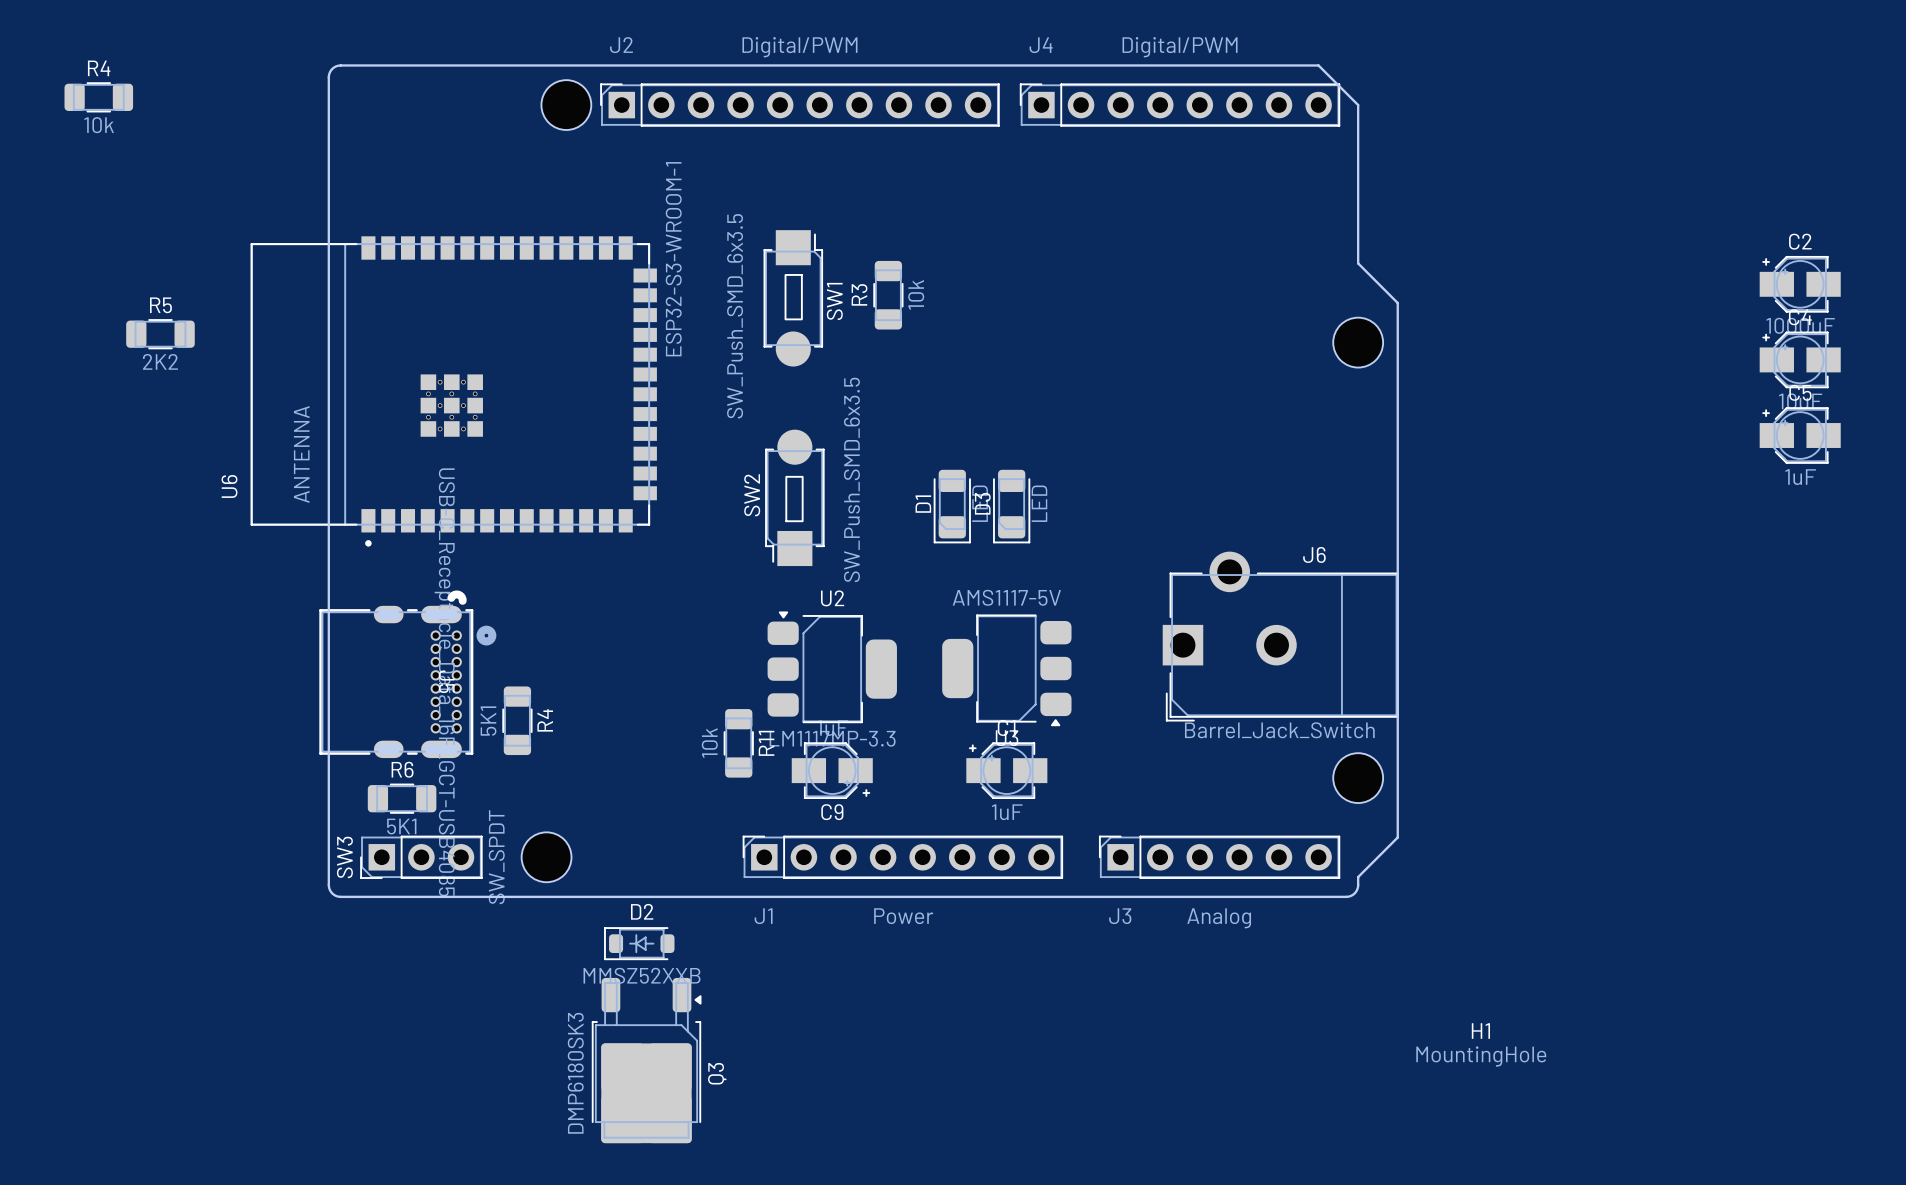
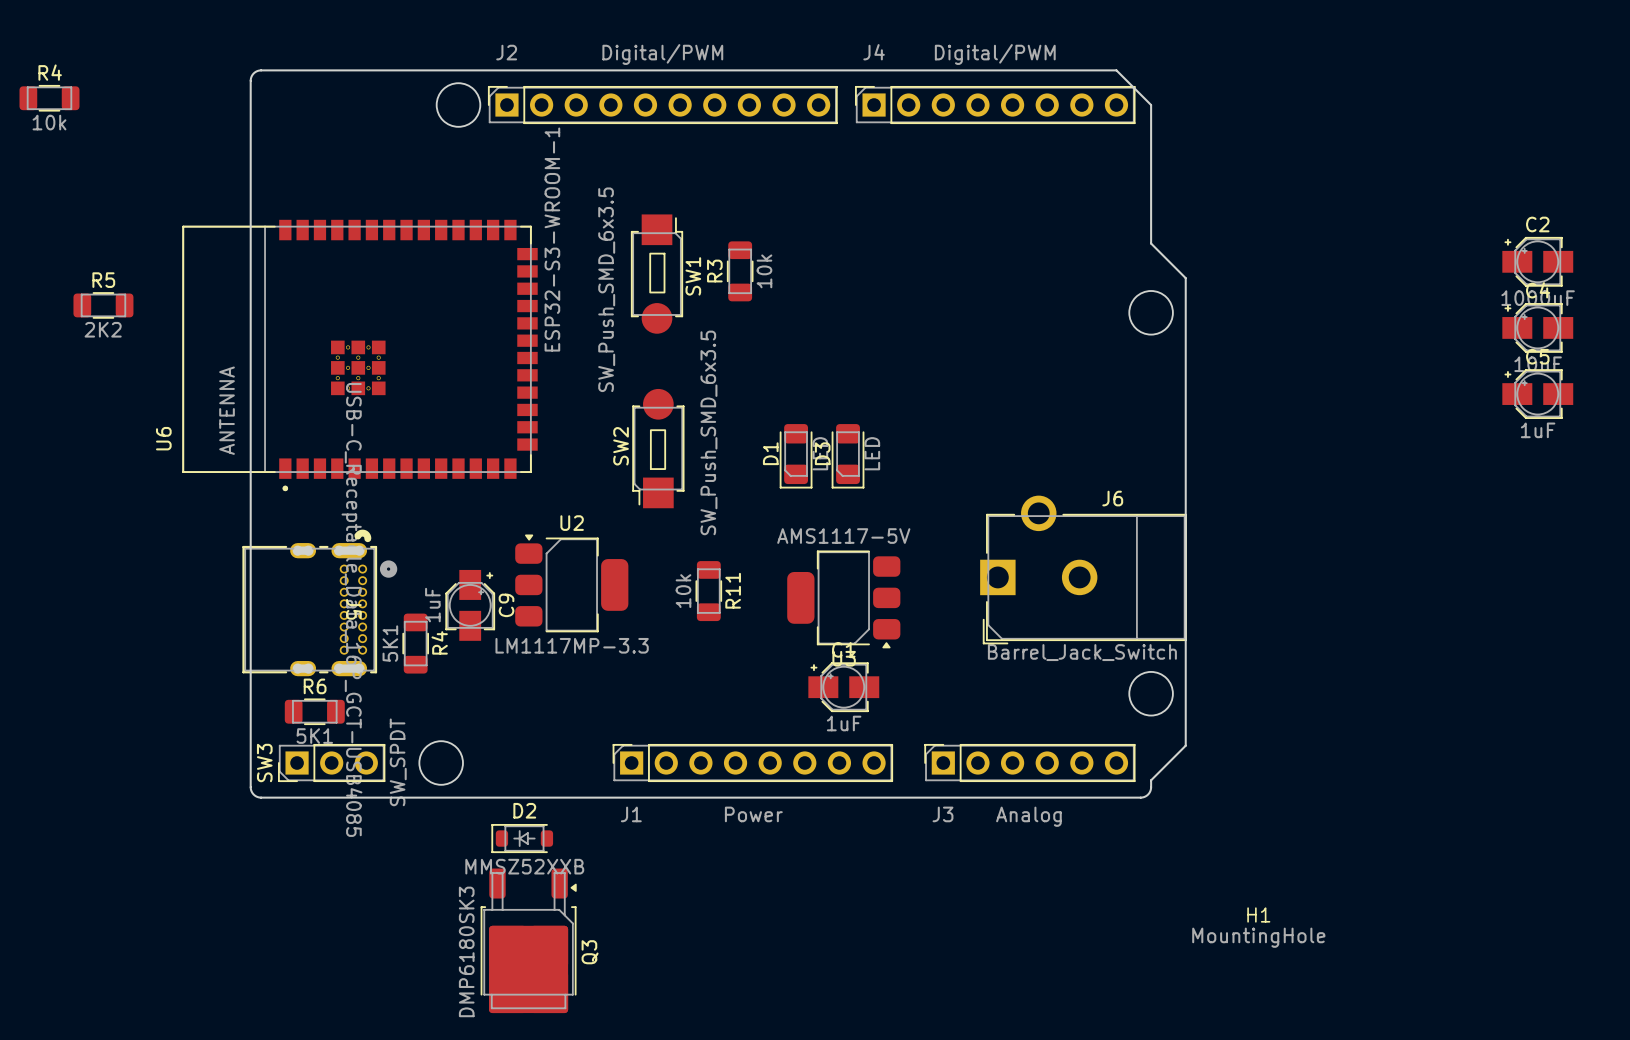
U2 position: (832, 667) -> (571, 583)
R11 position: (738, 743) -> (708, 591)
C9 rotation: 0° (832, 770) -> 90° counterclockwise (470, 605)
C9 position: (832, 770) -> (470, 605)

